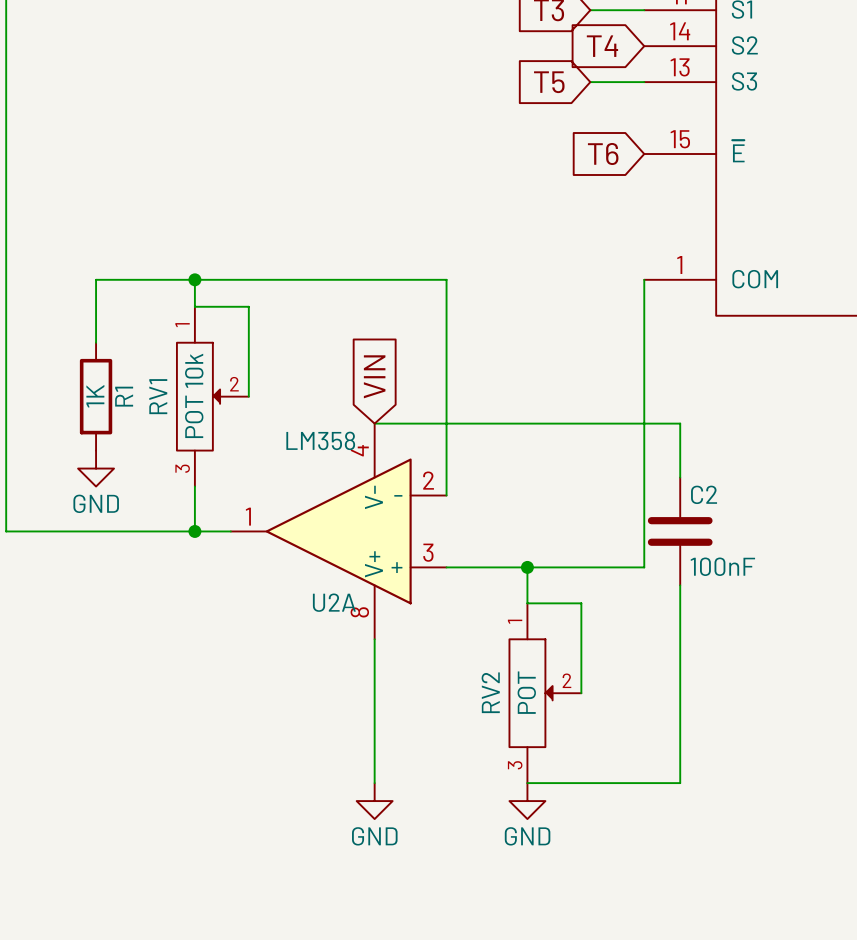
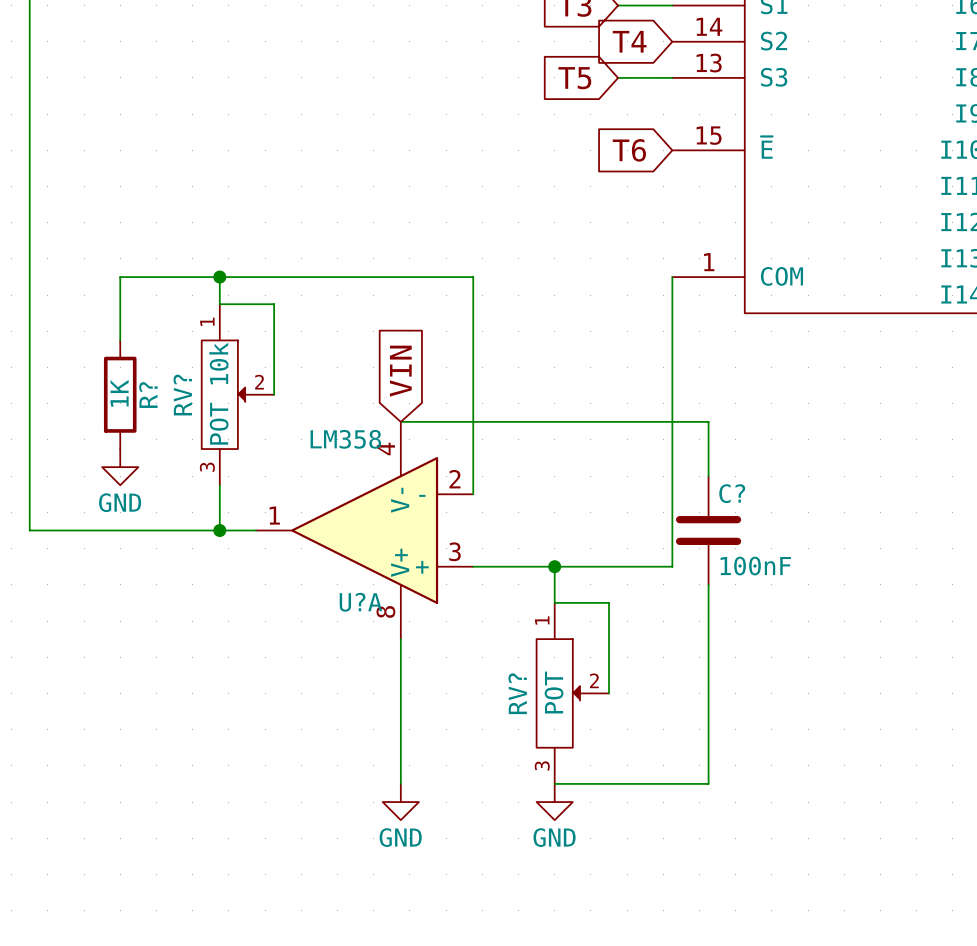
R1 name: R1 (124, 396) -> R? (148, 395)
RV1 name: RV1 (158, 396) -> RV? (182, 395)
C2 name: C2 (704, 494) -> C? (732, 493)
U2A name: U2A (334, 602) -> U?A (360, 602)
RV2 name: RV2 (490, 692) -> RV? (517, 693)

